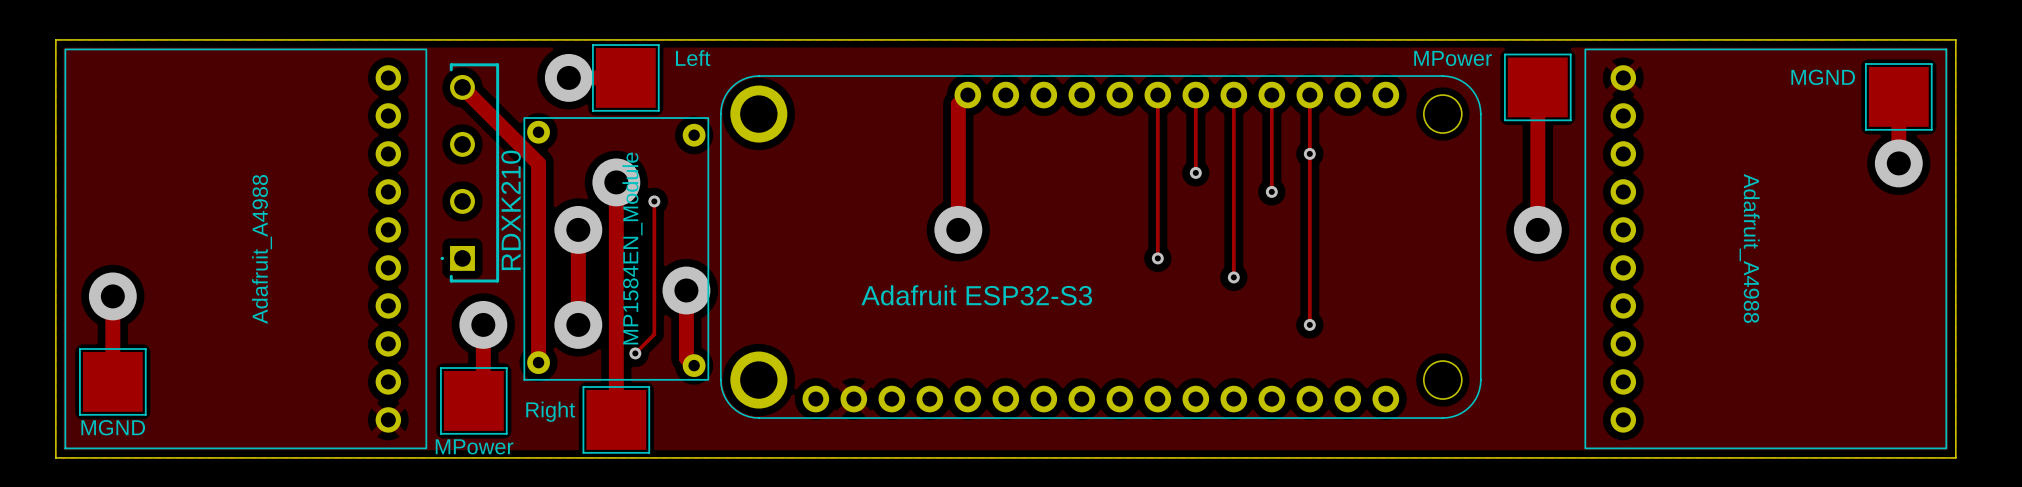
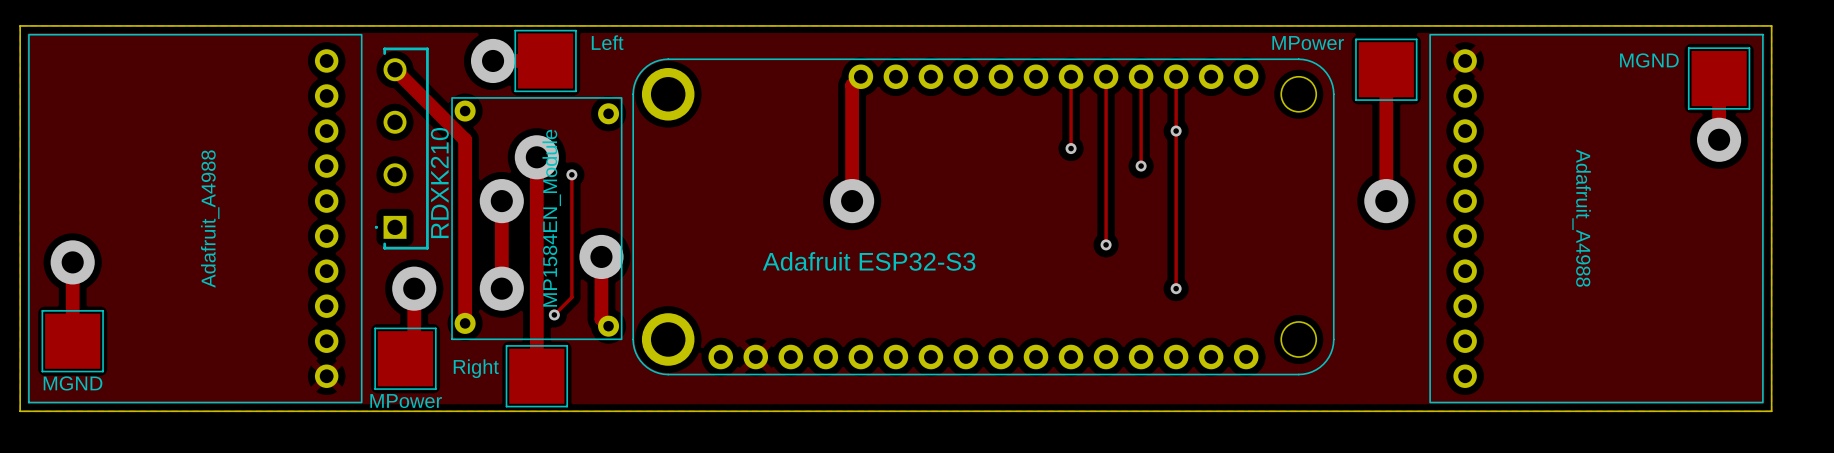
track: (1157, 95) (1157, 258) -> none
via: (1157, 258) -> none

